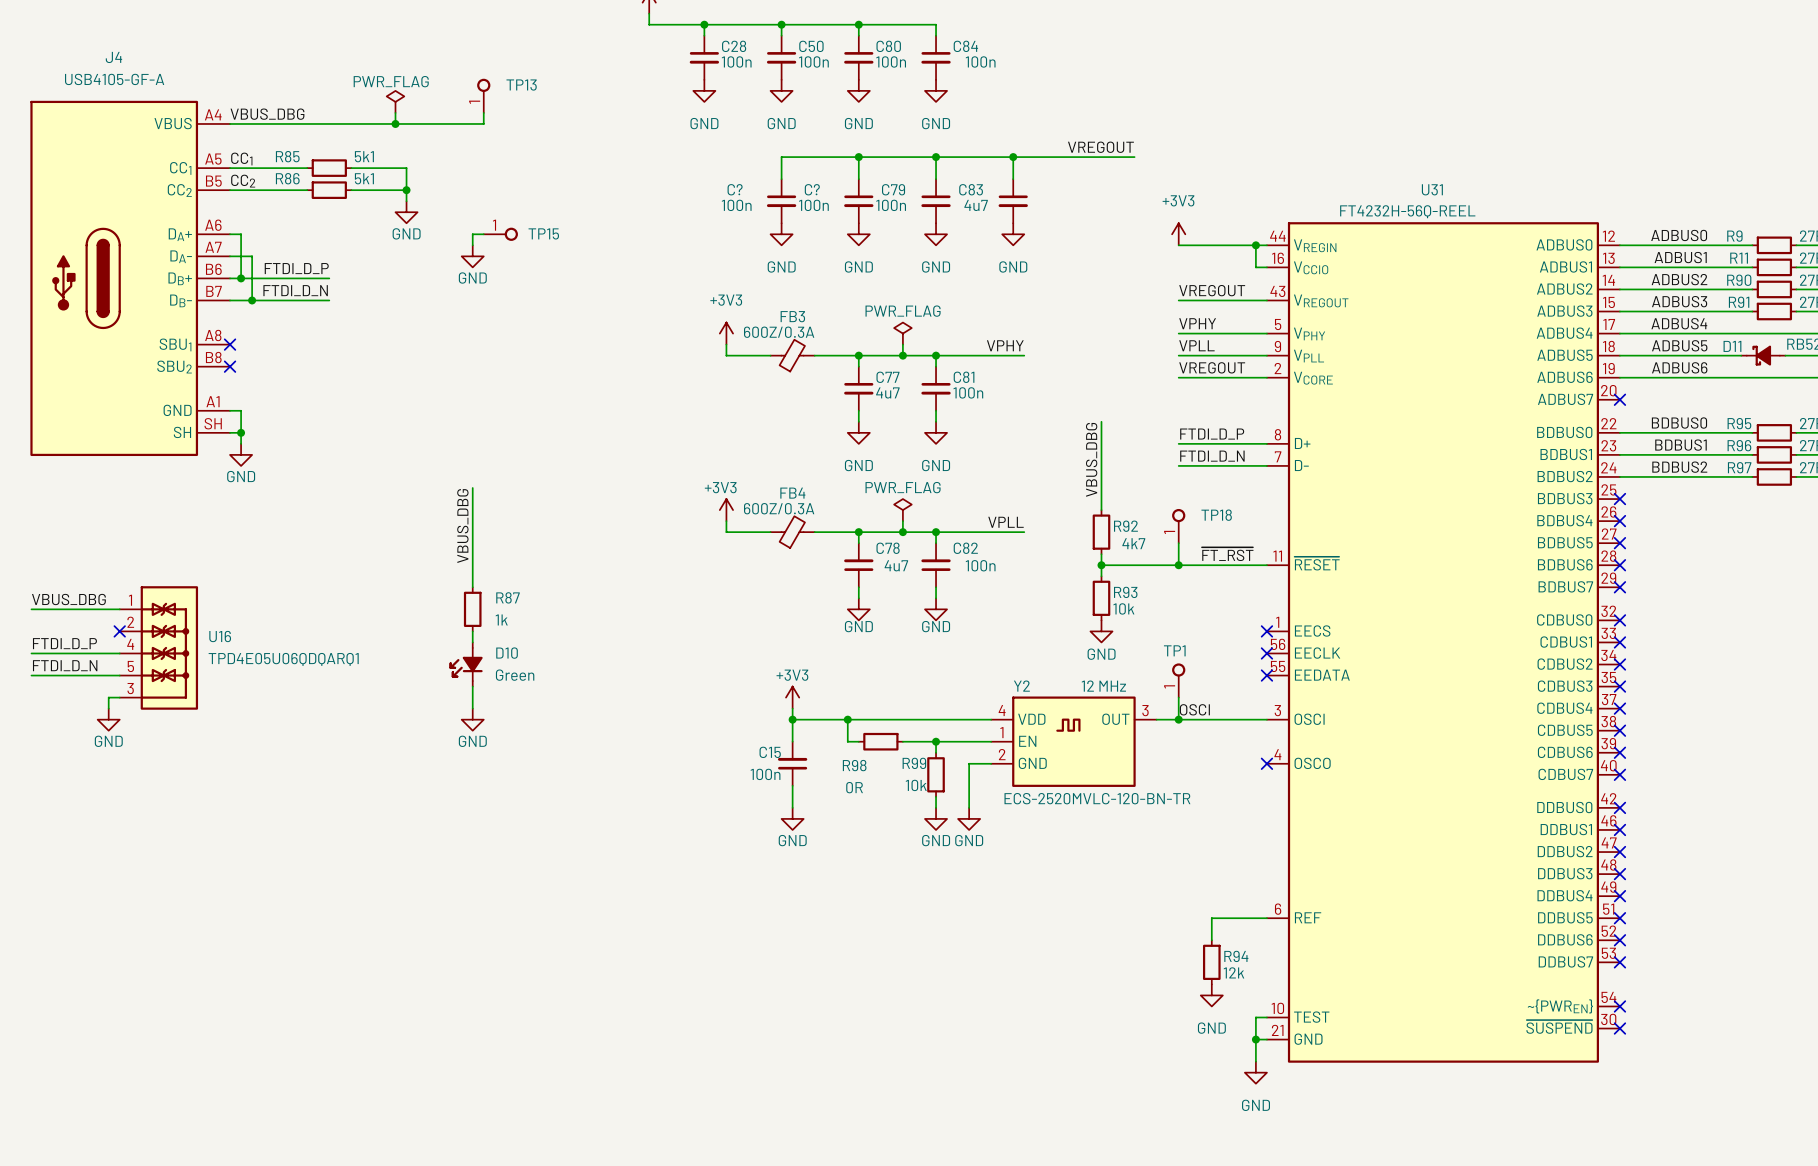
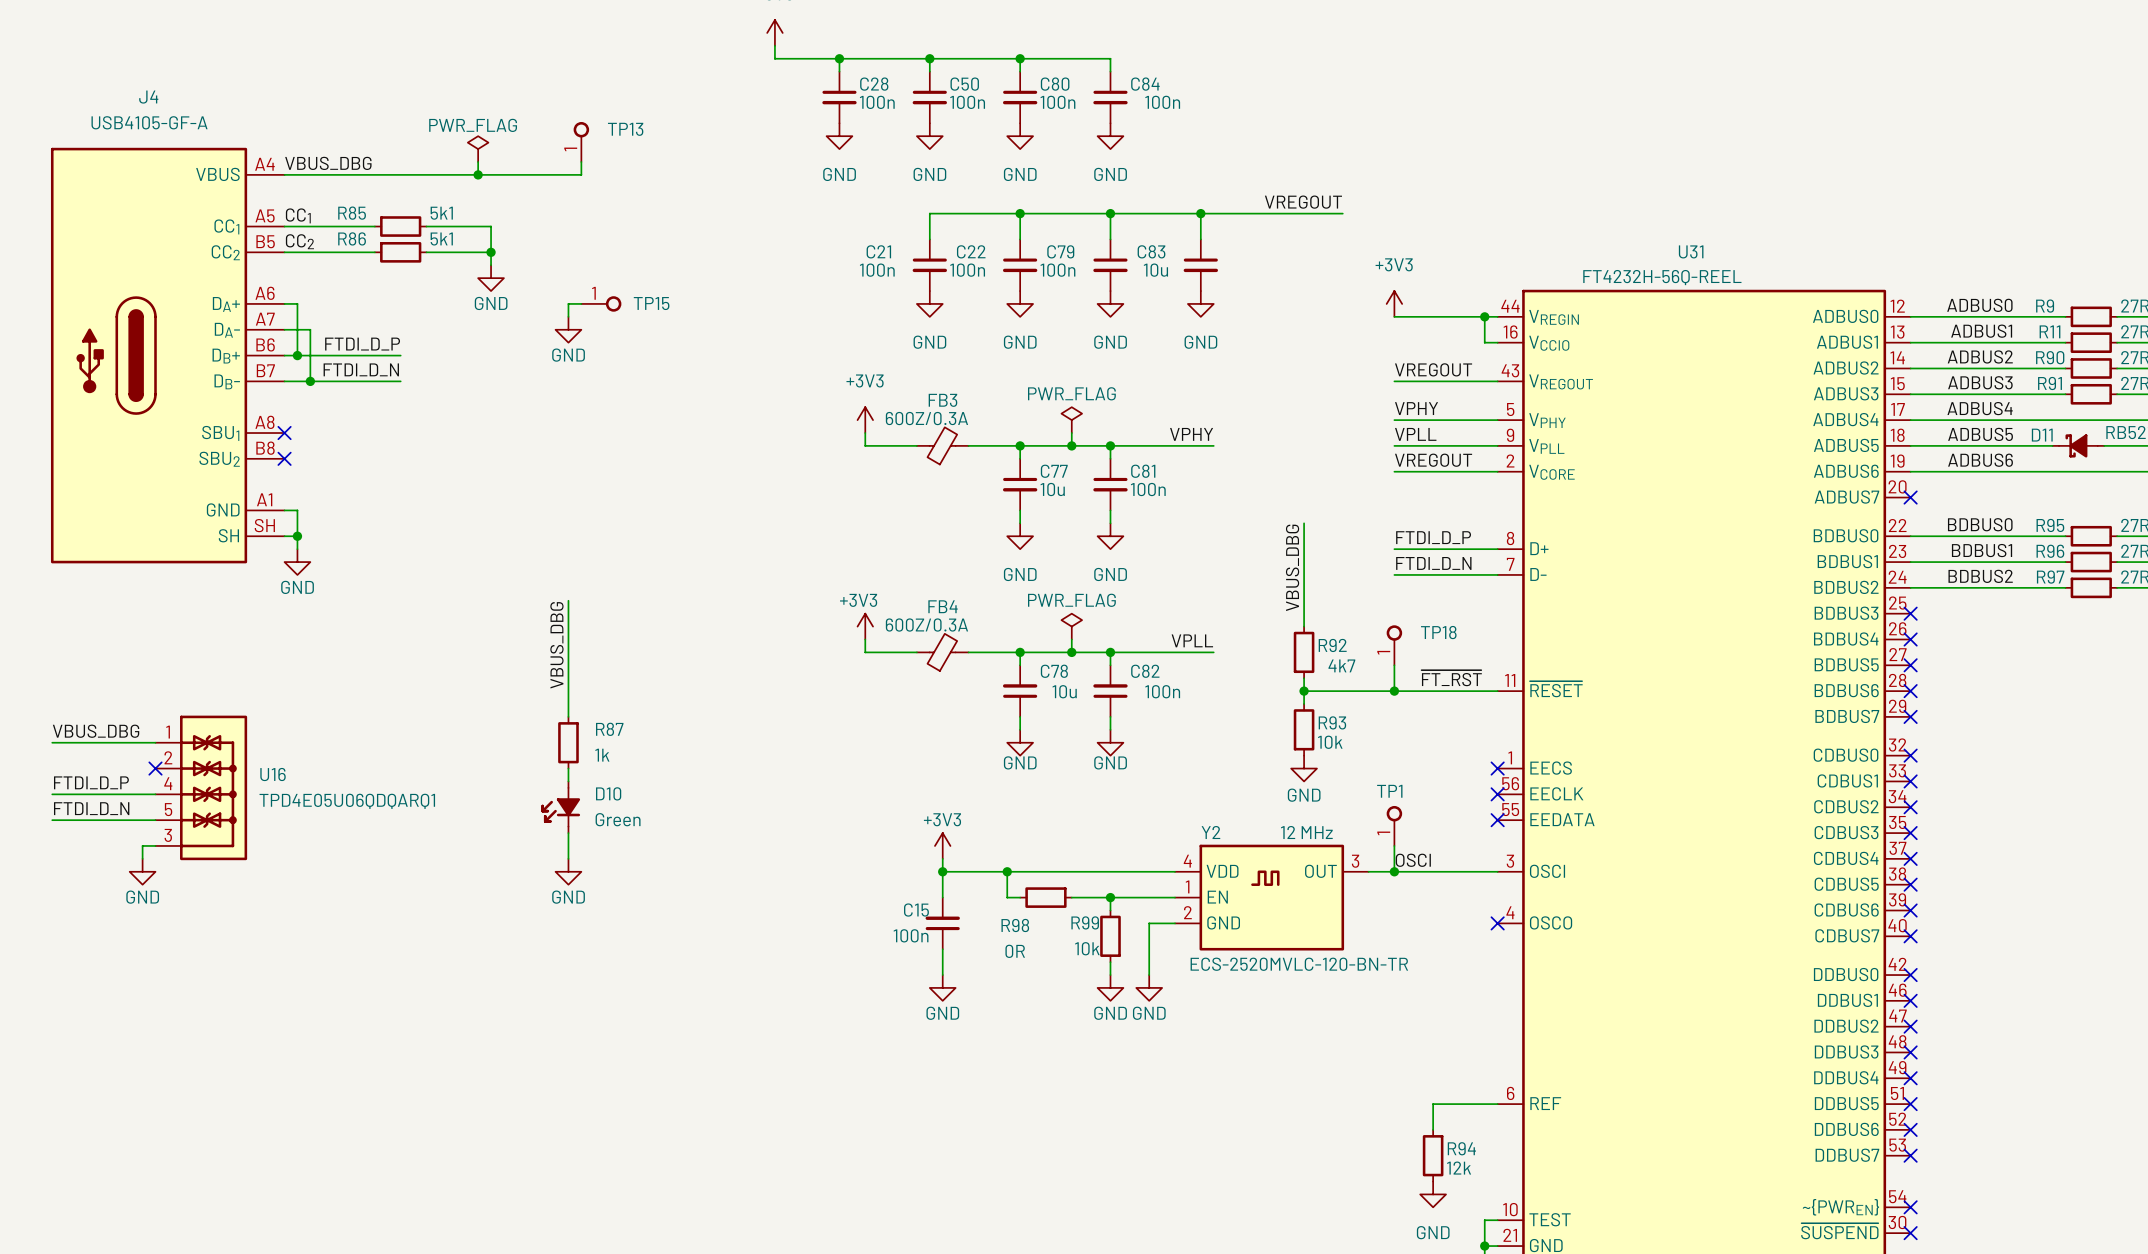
C? name: C? (735, 189) -> C21 (878, 251)
C? name: C? (812, 189) -> C22 (971, 251)
C83 text: 4u7 (976, 205) -> 10u (1155, 270)
C77 text: 4u7 (887, 392) -> 10u (1052, 489)
C78 text: 4u7 (896, 565) -> 10u (1064, 691)

